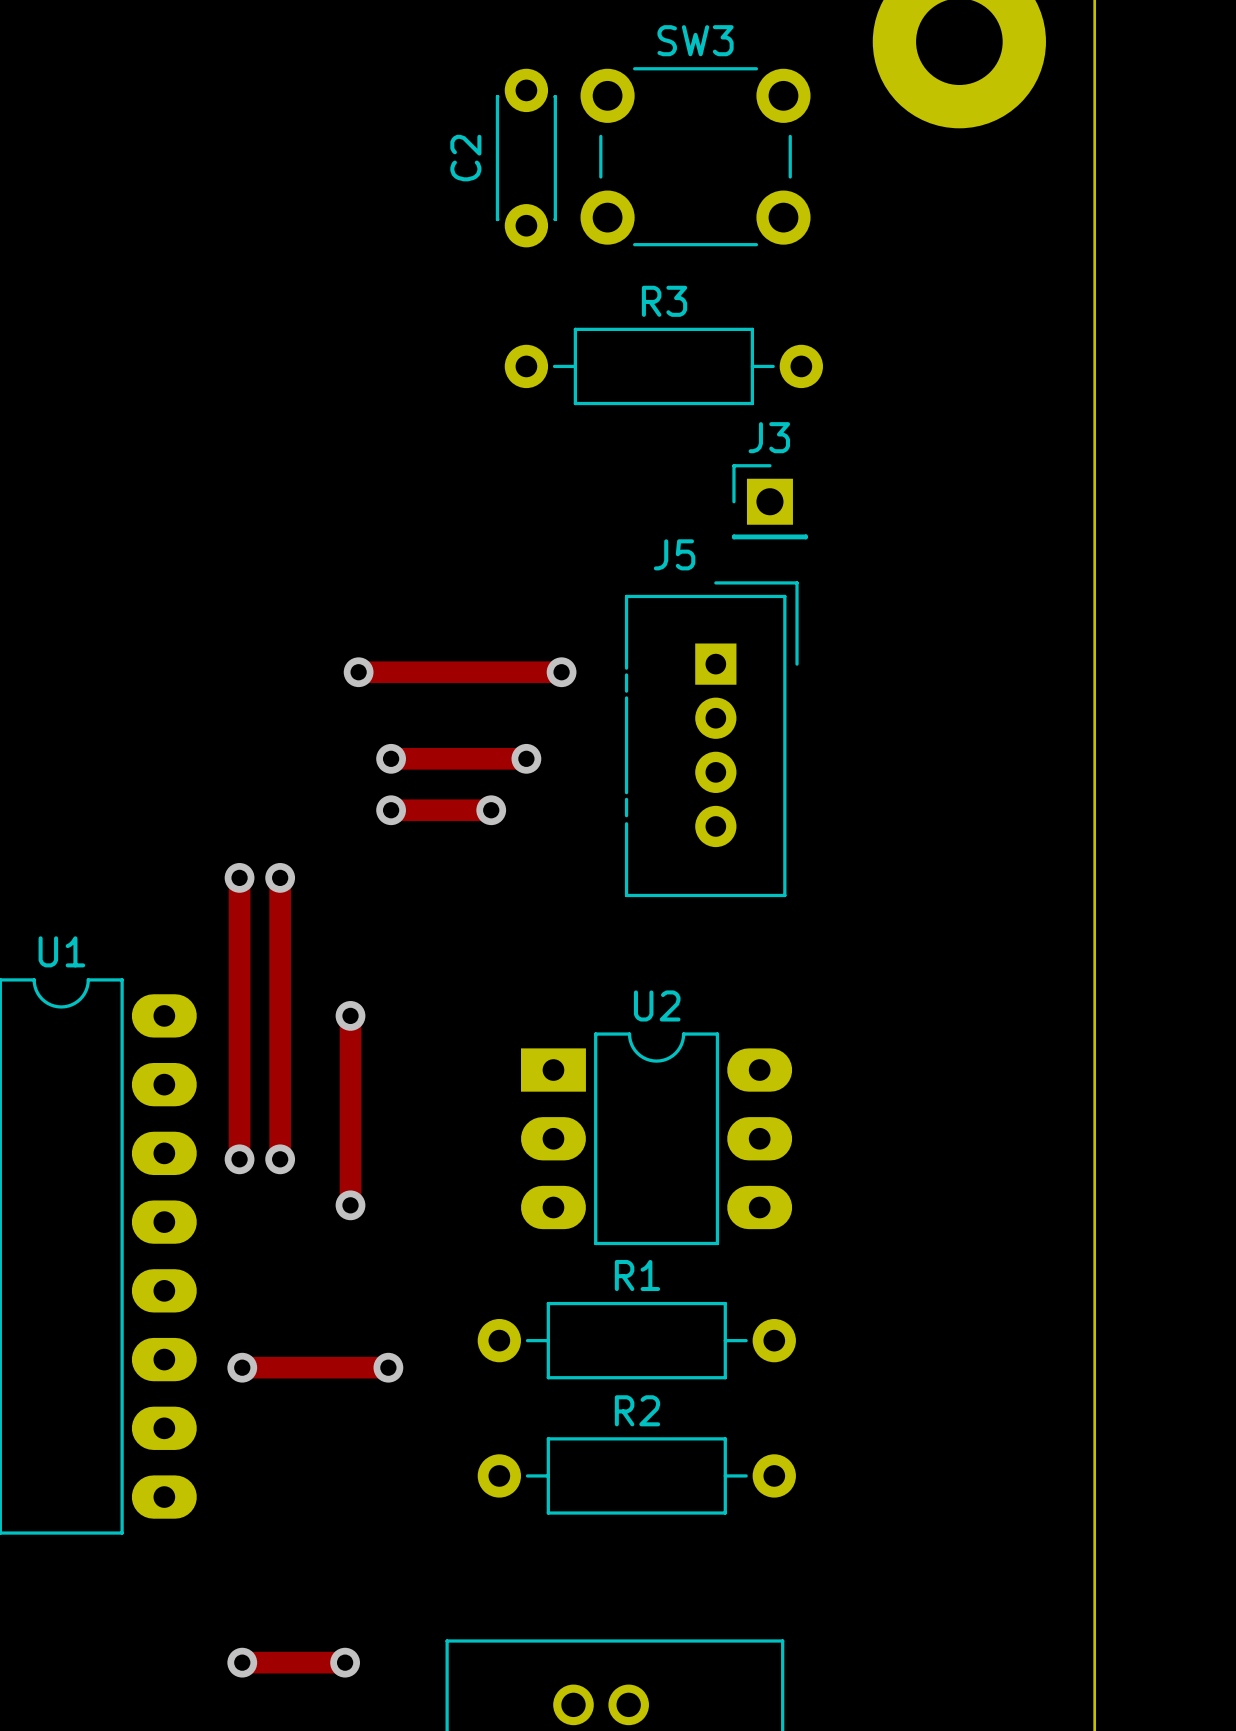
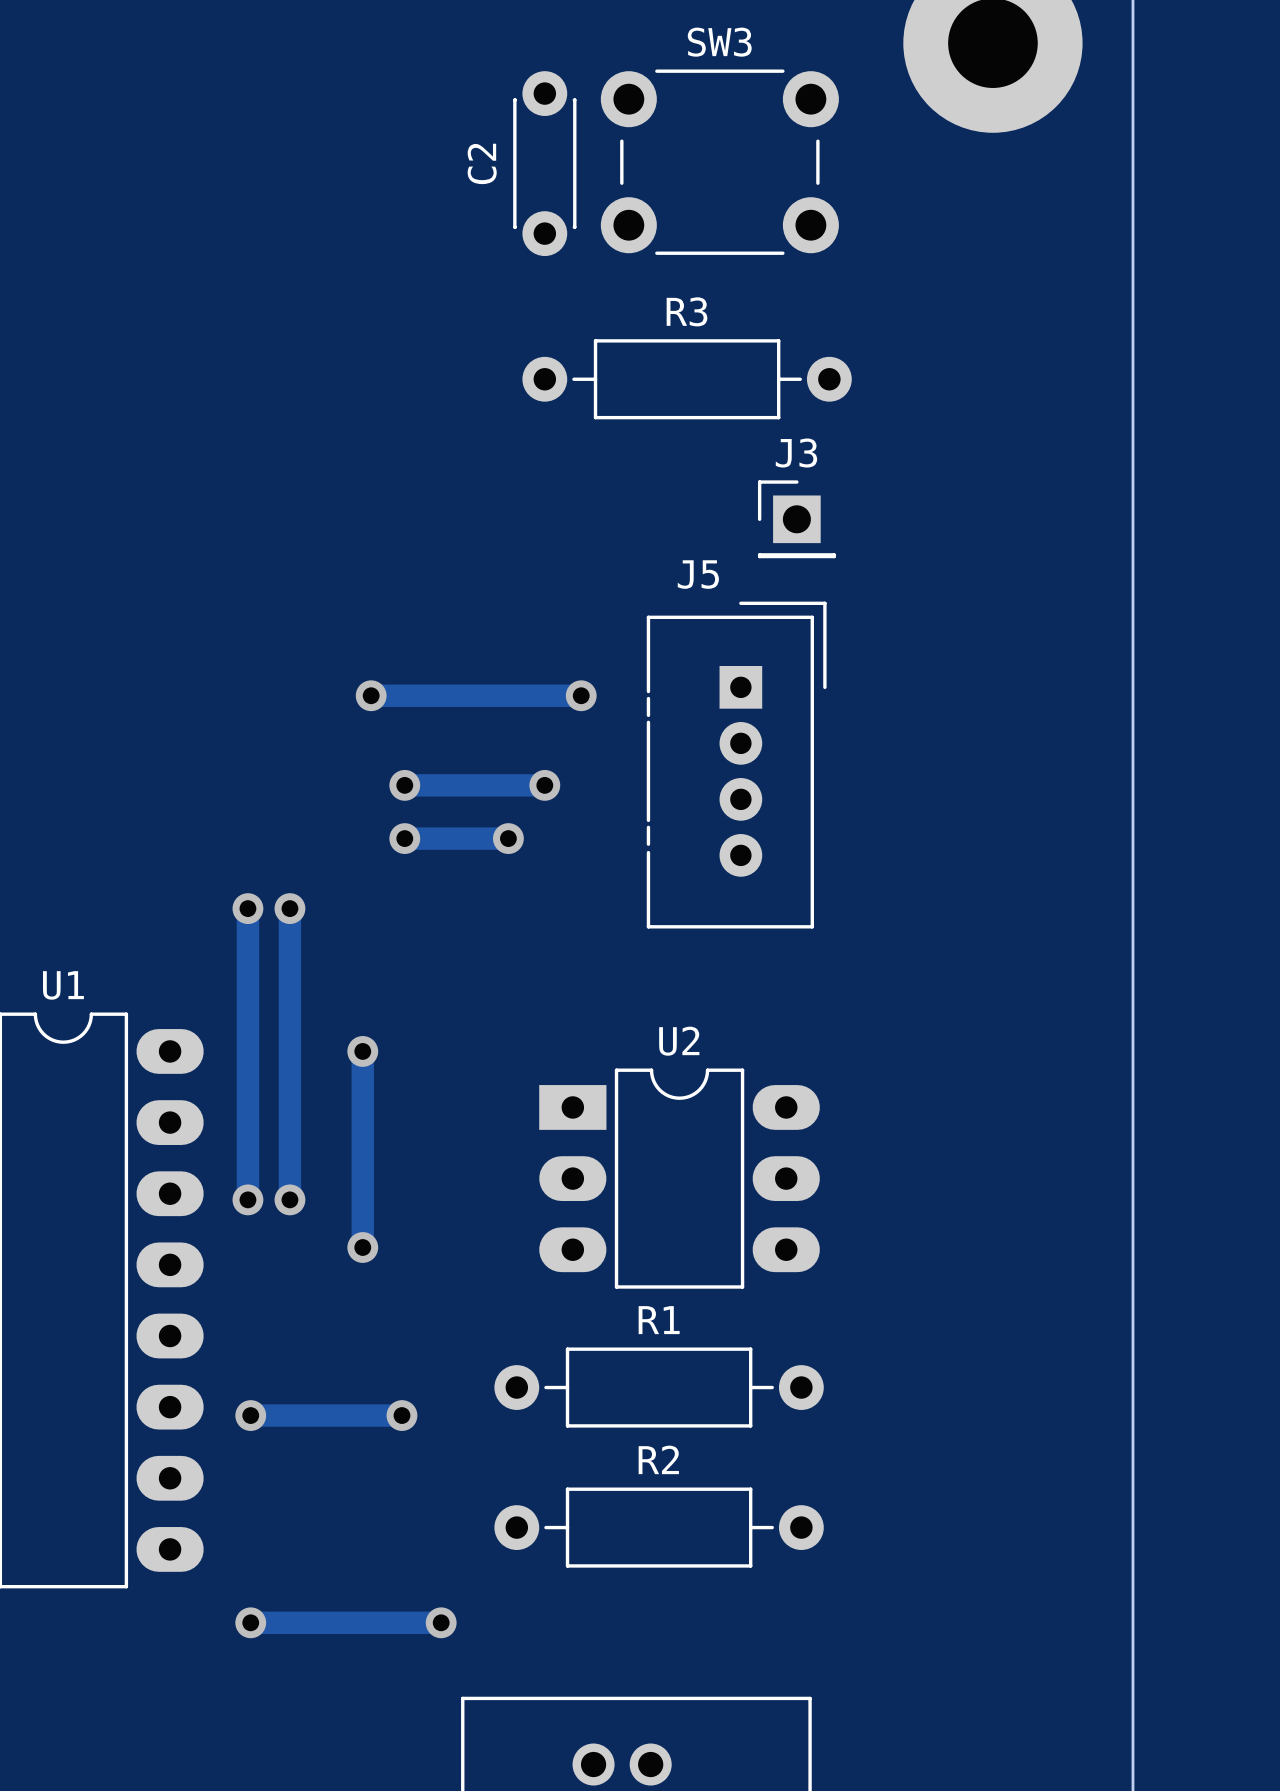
track: none -> (250, 1622) (441, 1622)
via: none -> (250, 1622)
via: none -> (441, 1622)
track: (242, 1662) (345, 1662) -> none
via: (242, 1662) -> none
via: (345, 1662) -> none

